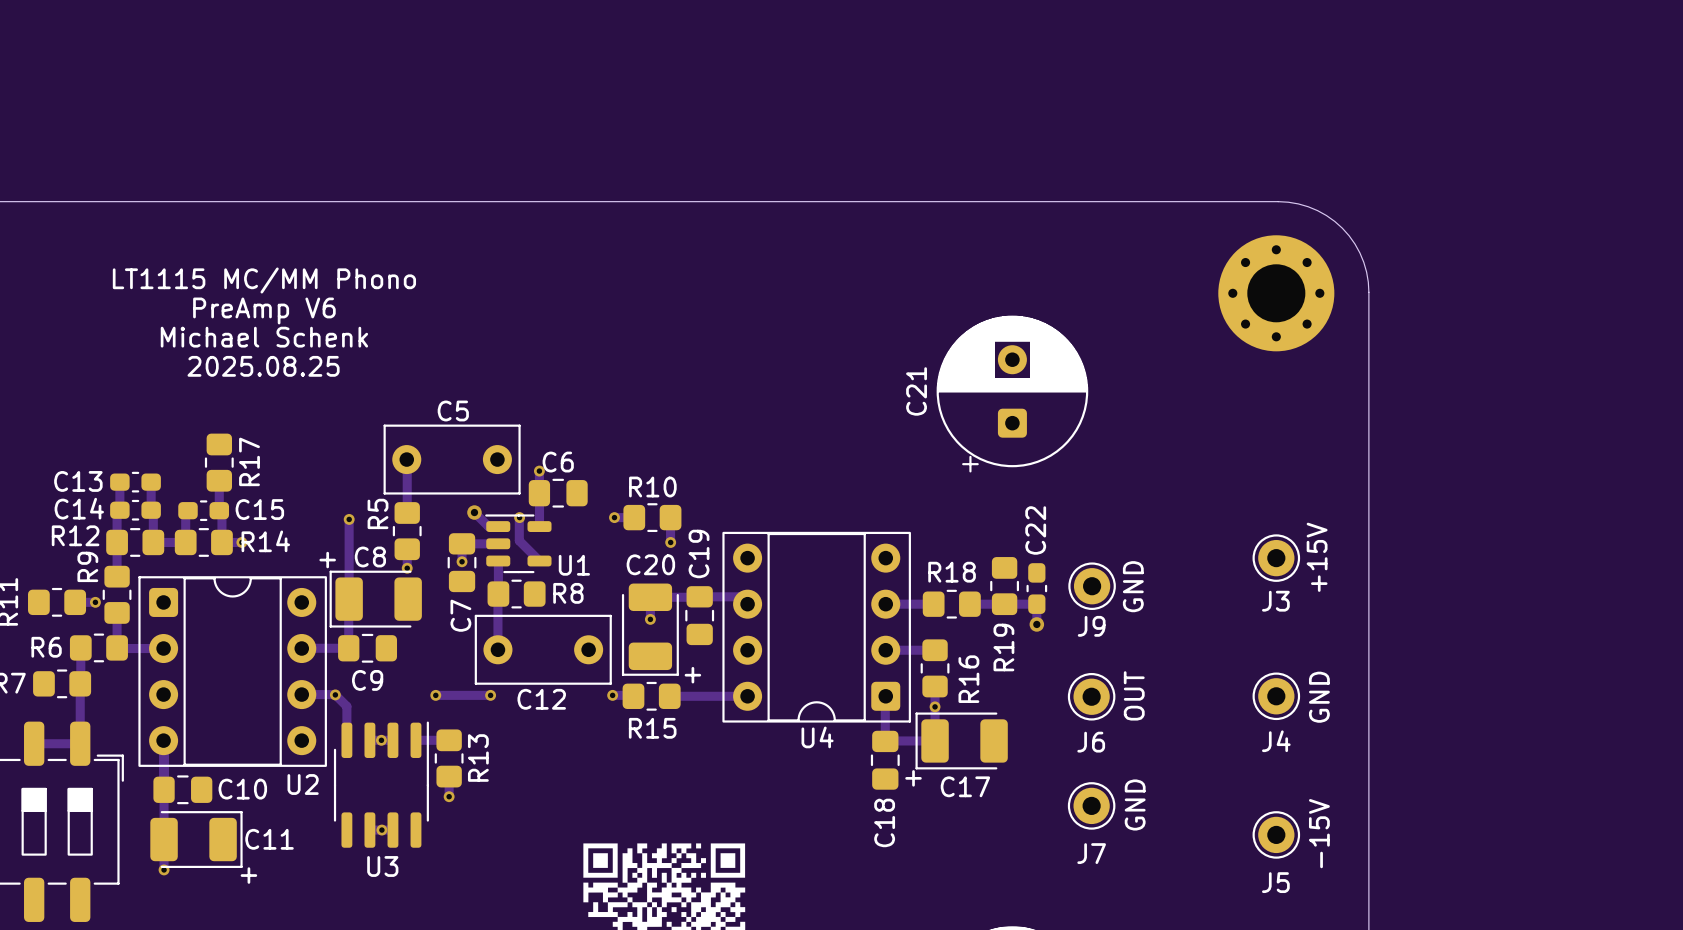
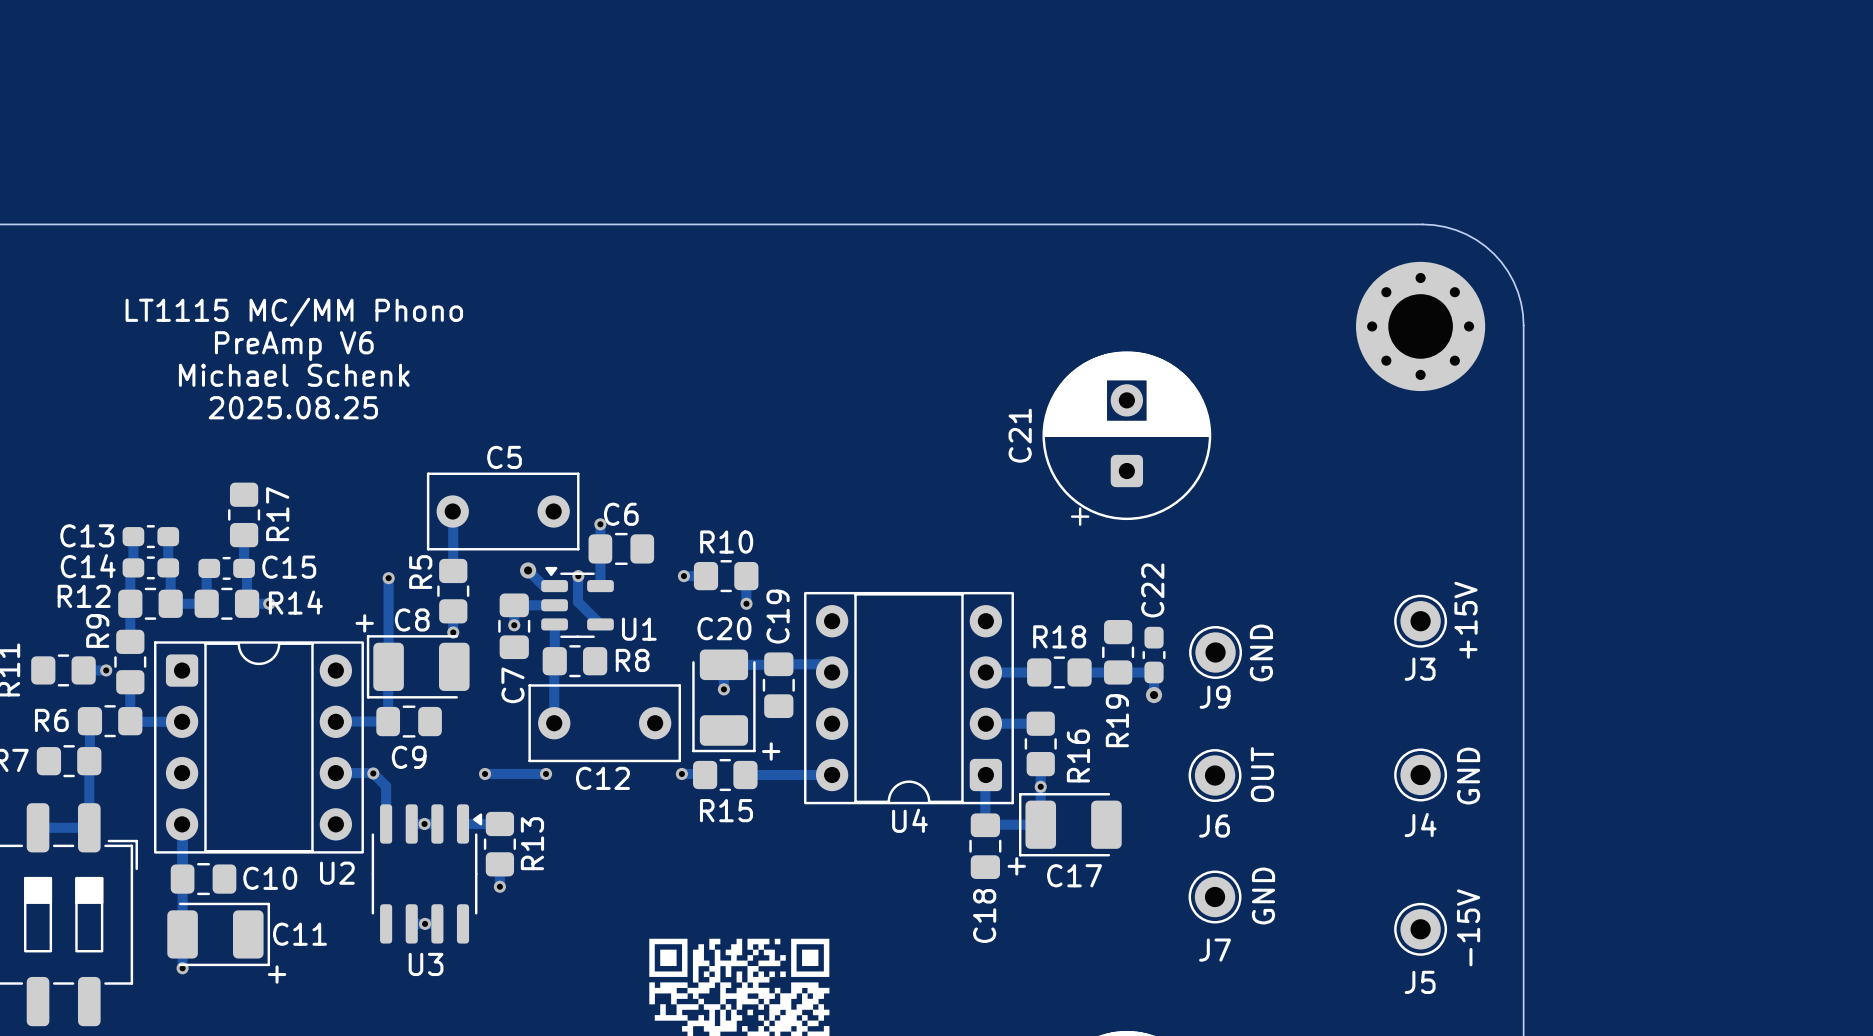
U1 footprint: [485, 514, 552, 574] -> [541, 566, 614, 638]
U3 footprint: [333, 721, 429, 848] -> [371, 804, 483, 944]

